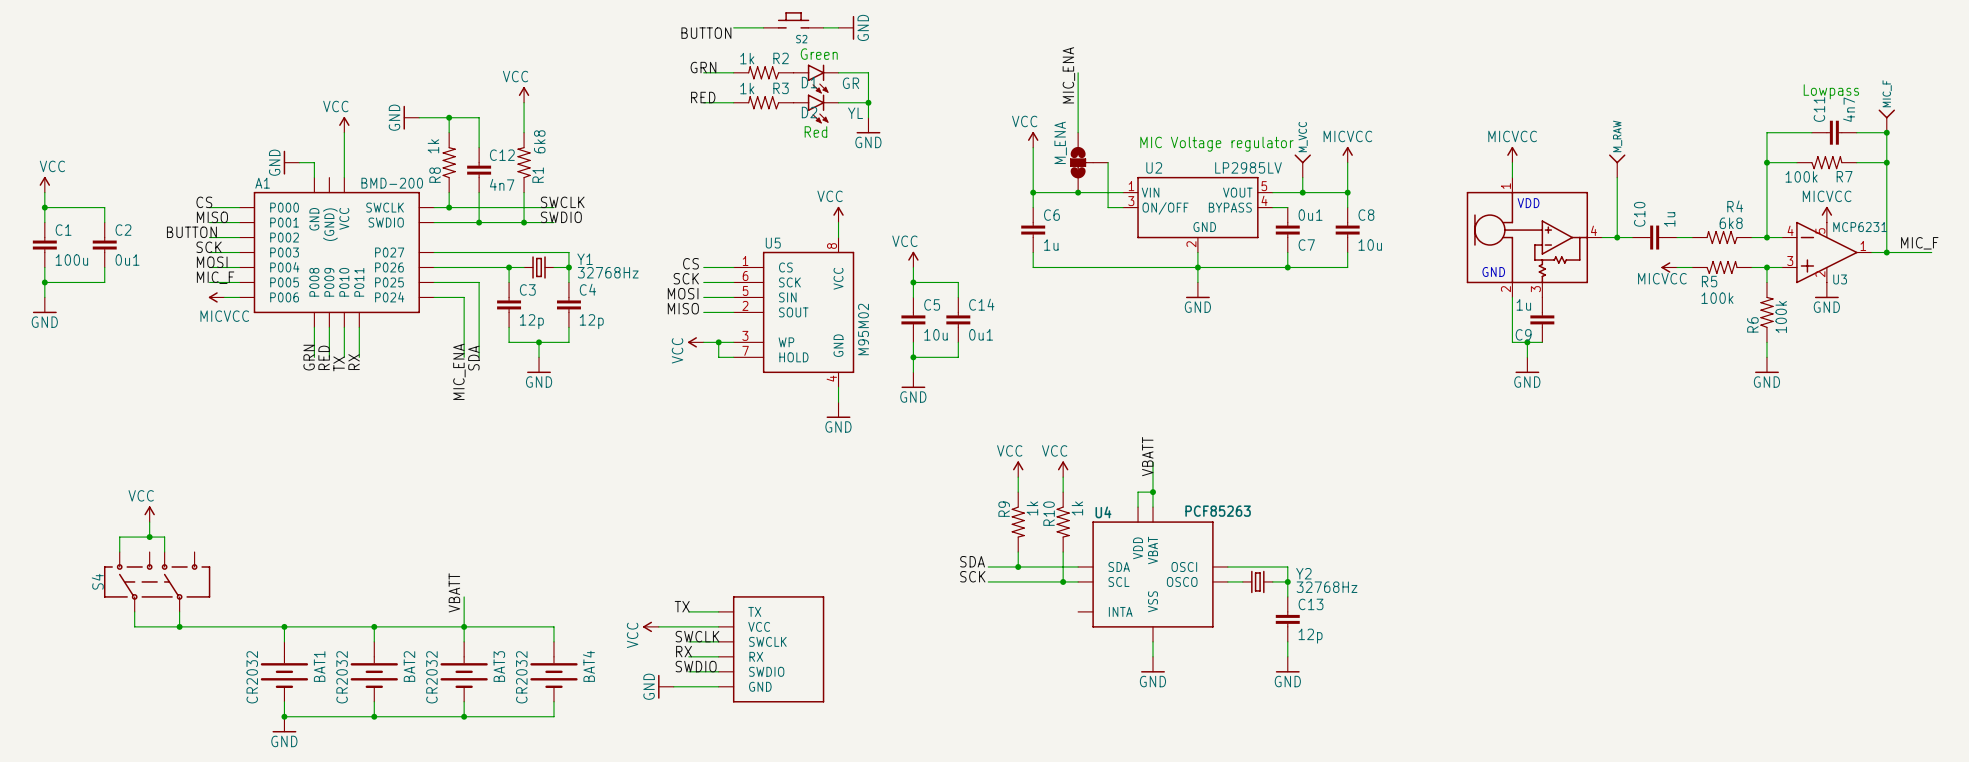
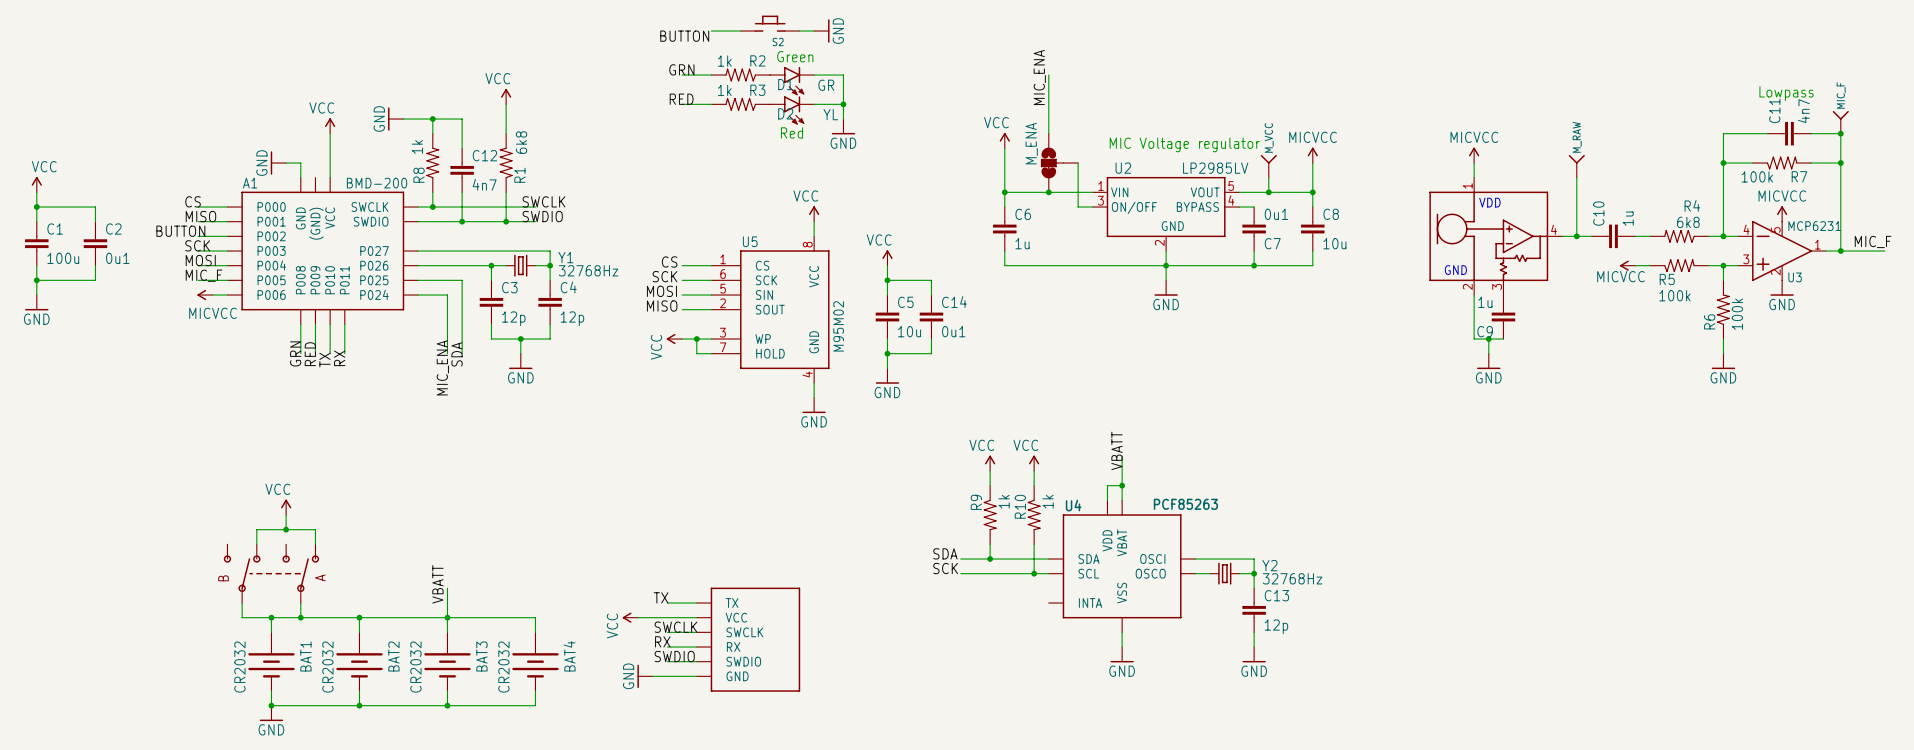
power symbol: VCC (149, 514) -> none
power symbol: none -> VCC (286, 507)
wire: (149, 522) (149, 537) -> none
wire: none -> (286, 515) (286, 529)
junction: (149, 537) -> none
junction: none -> (286, 529)
wire: (119, 552) (119, 537) (164, 537) (164, 552) -> none
wire: none -> (256, 544) (256, 529) (315, 529) (315, 544)
S4: (157, 581) -> none
part: none -> (271, 573)
wire: (134, 611) (134, 626) (254, 626) -> (242, 603) (242, 617)
wire: (179, 611) (179, 626) -> (300, 603) (300, 617)
junction: (179, 626) -> none
junction: none -> (300, 617)

